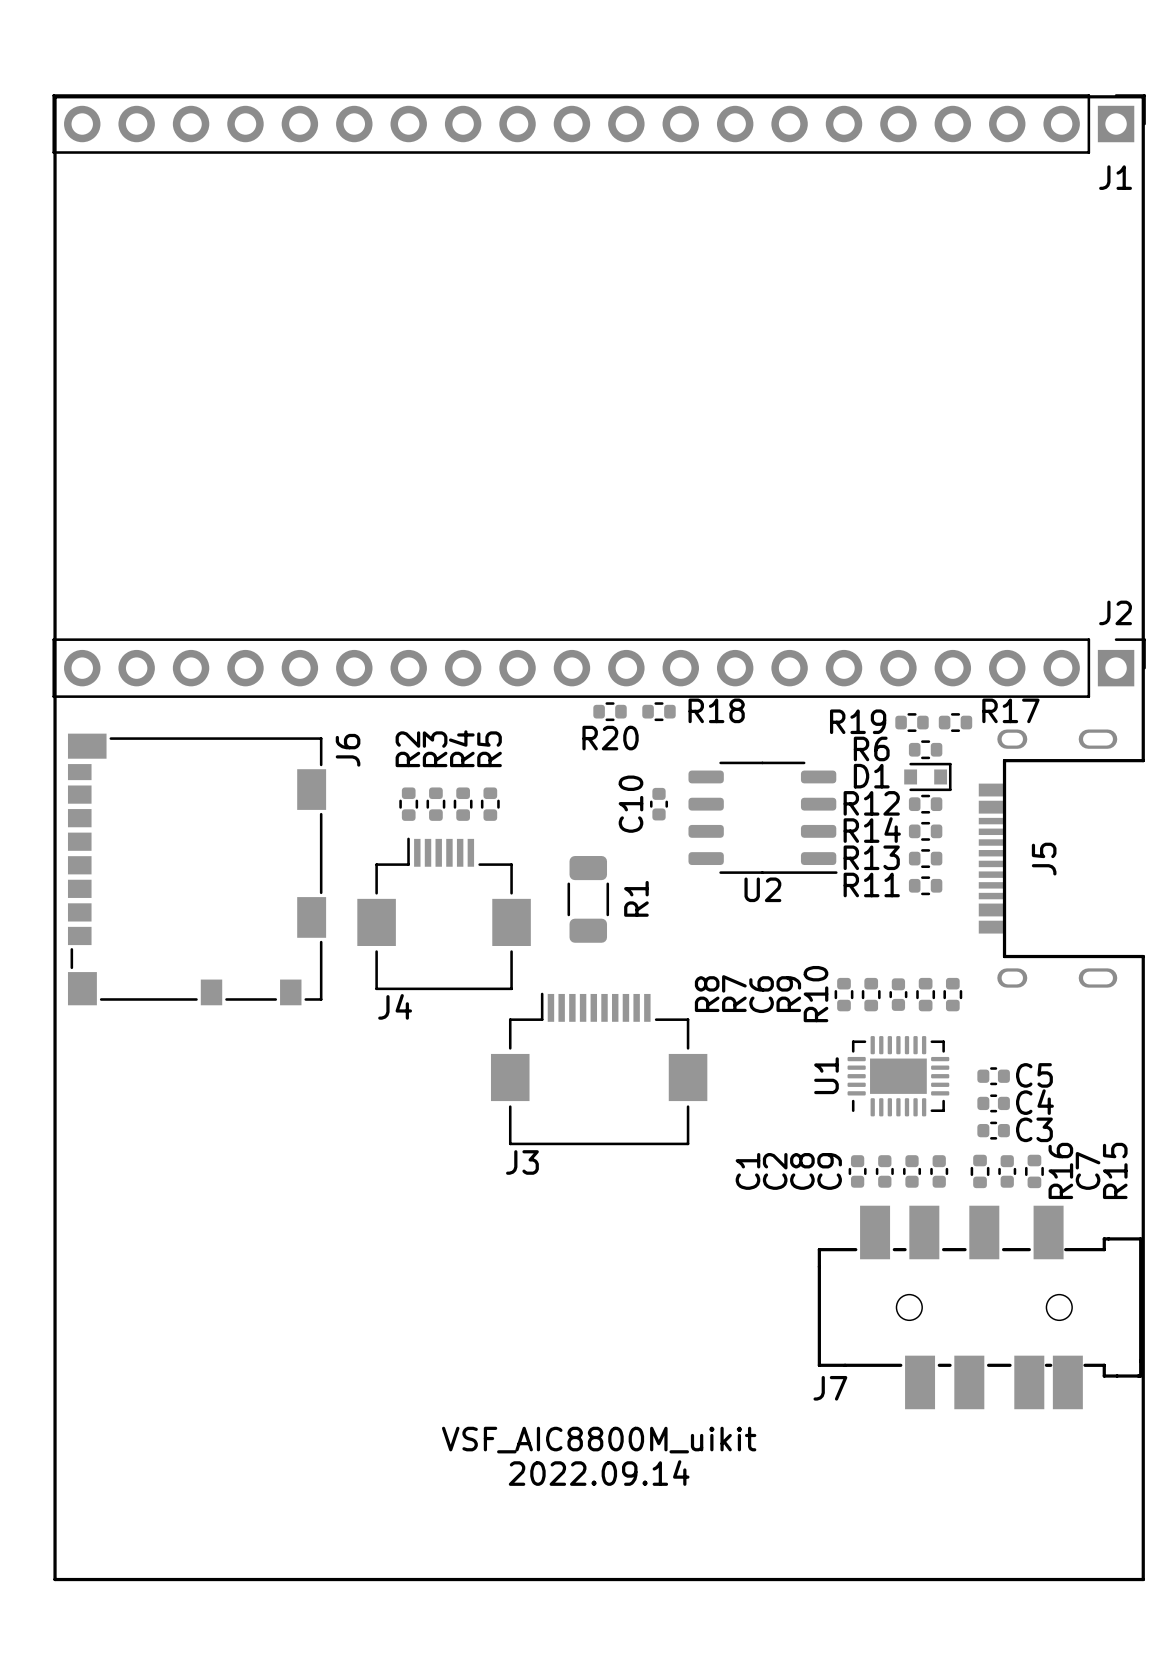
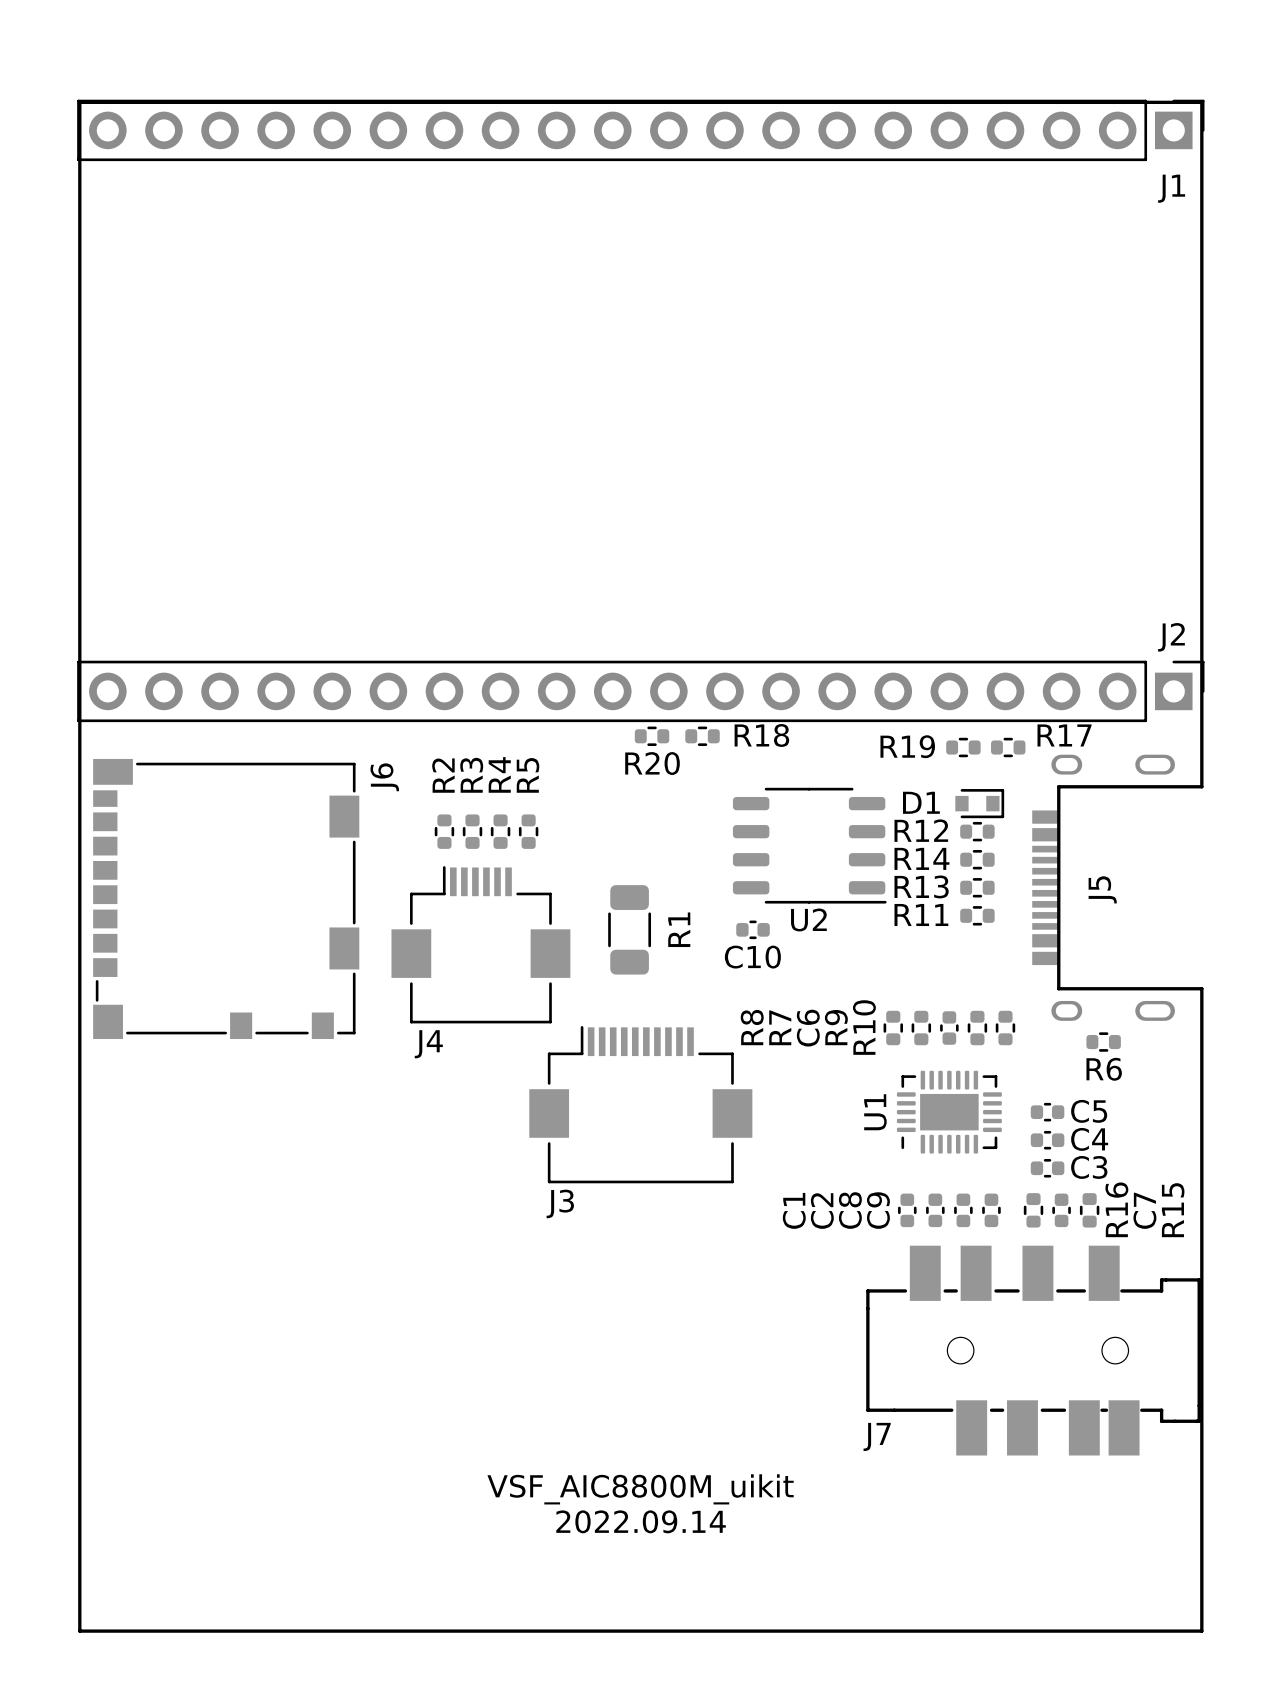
R6 name position: R6 (871, 748) -> R6 (1104, 1069)
R6 position: (925, 749) -> (1103, 1042)
C10 rotation: 0° (659, 804) -> 90° clockwise (753, 929)
C10 position: (659, 804) -> (753, 929)

